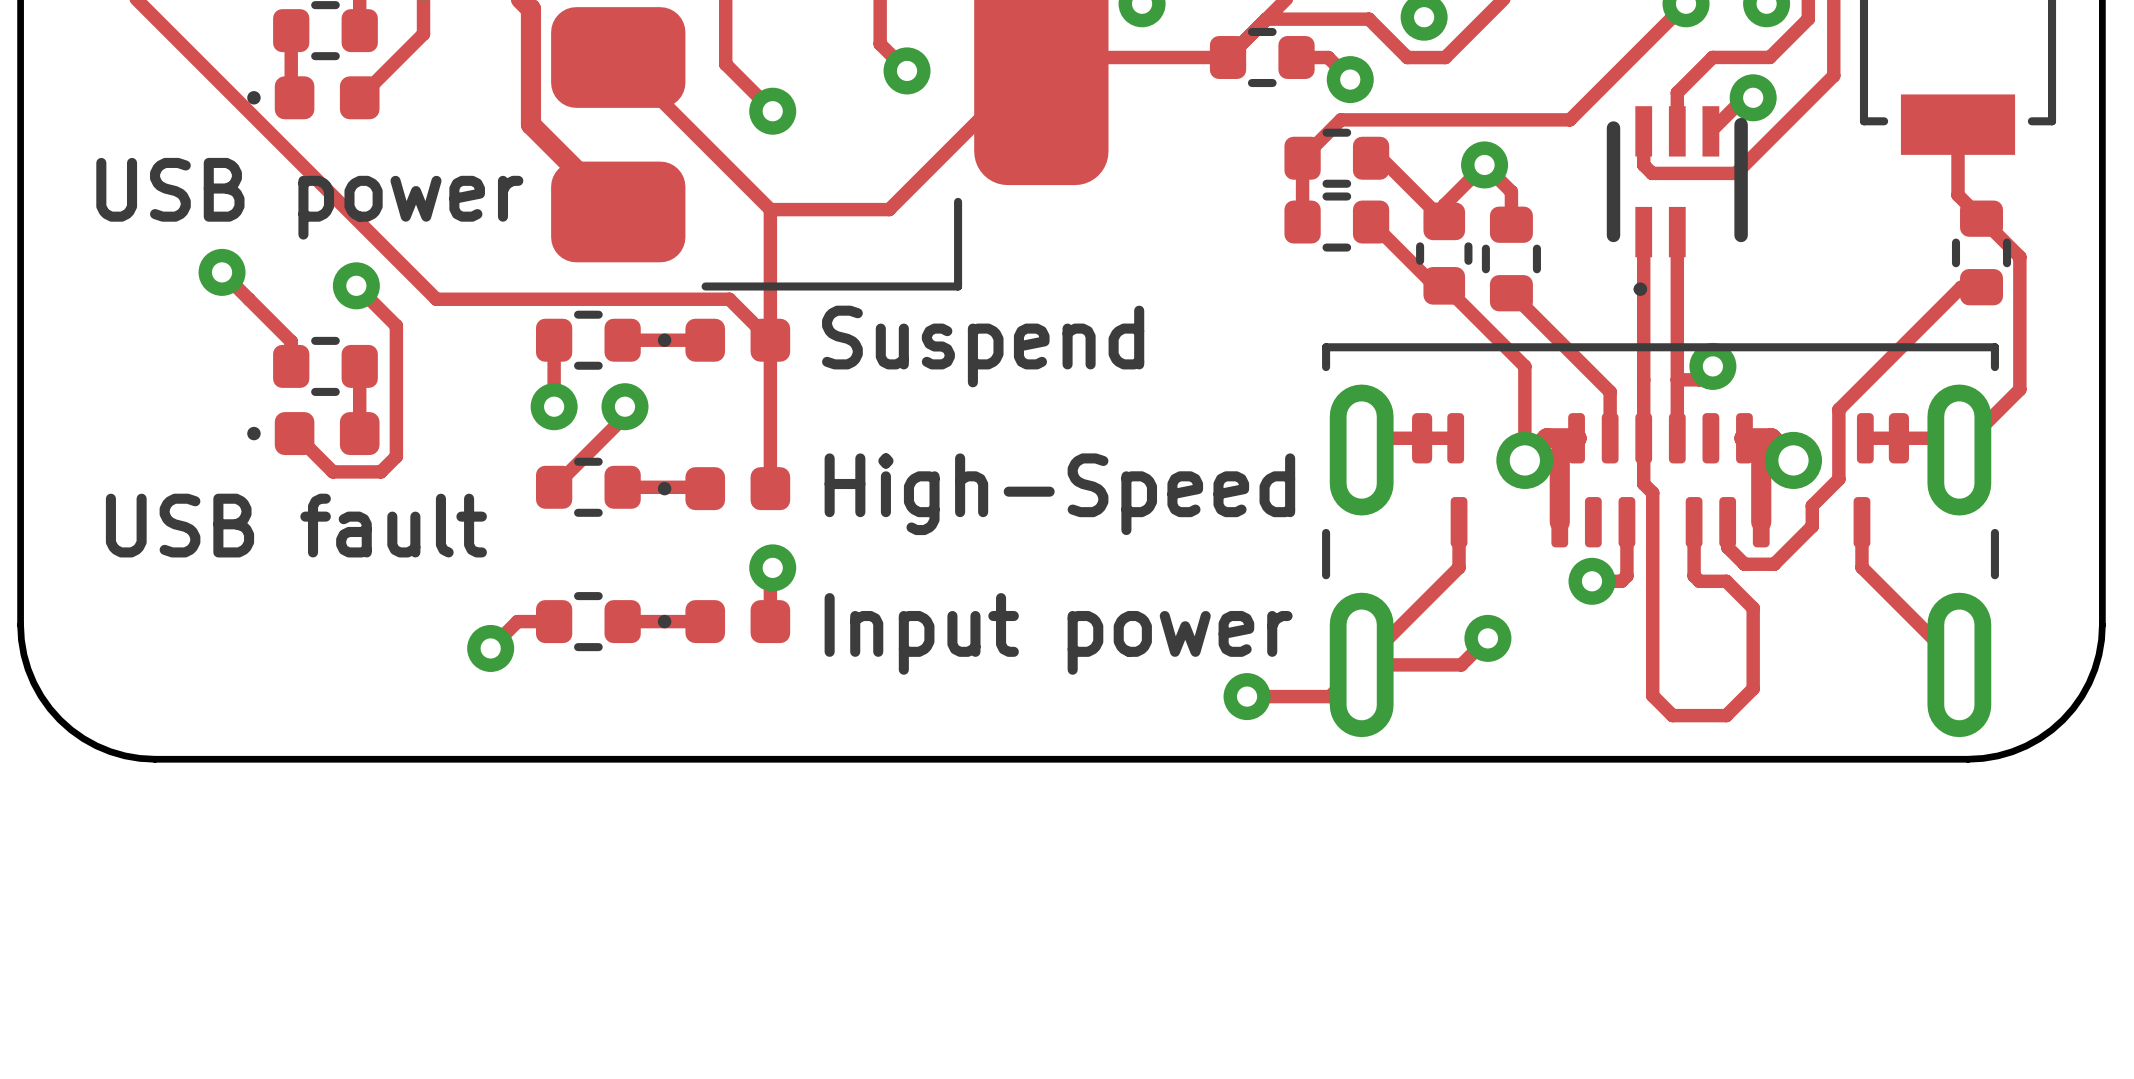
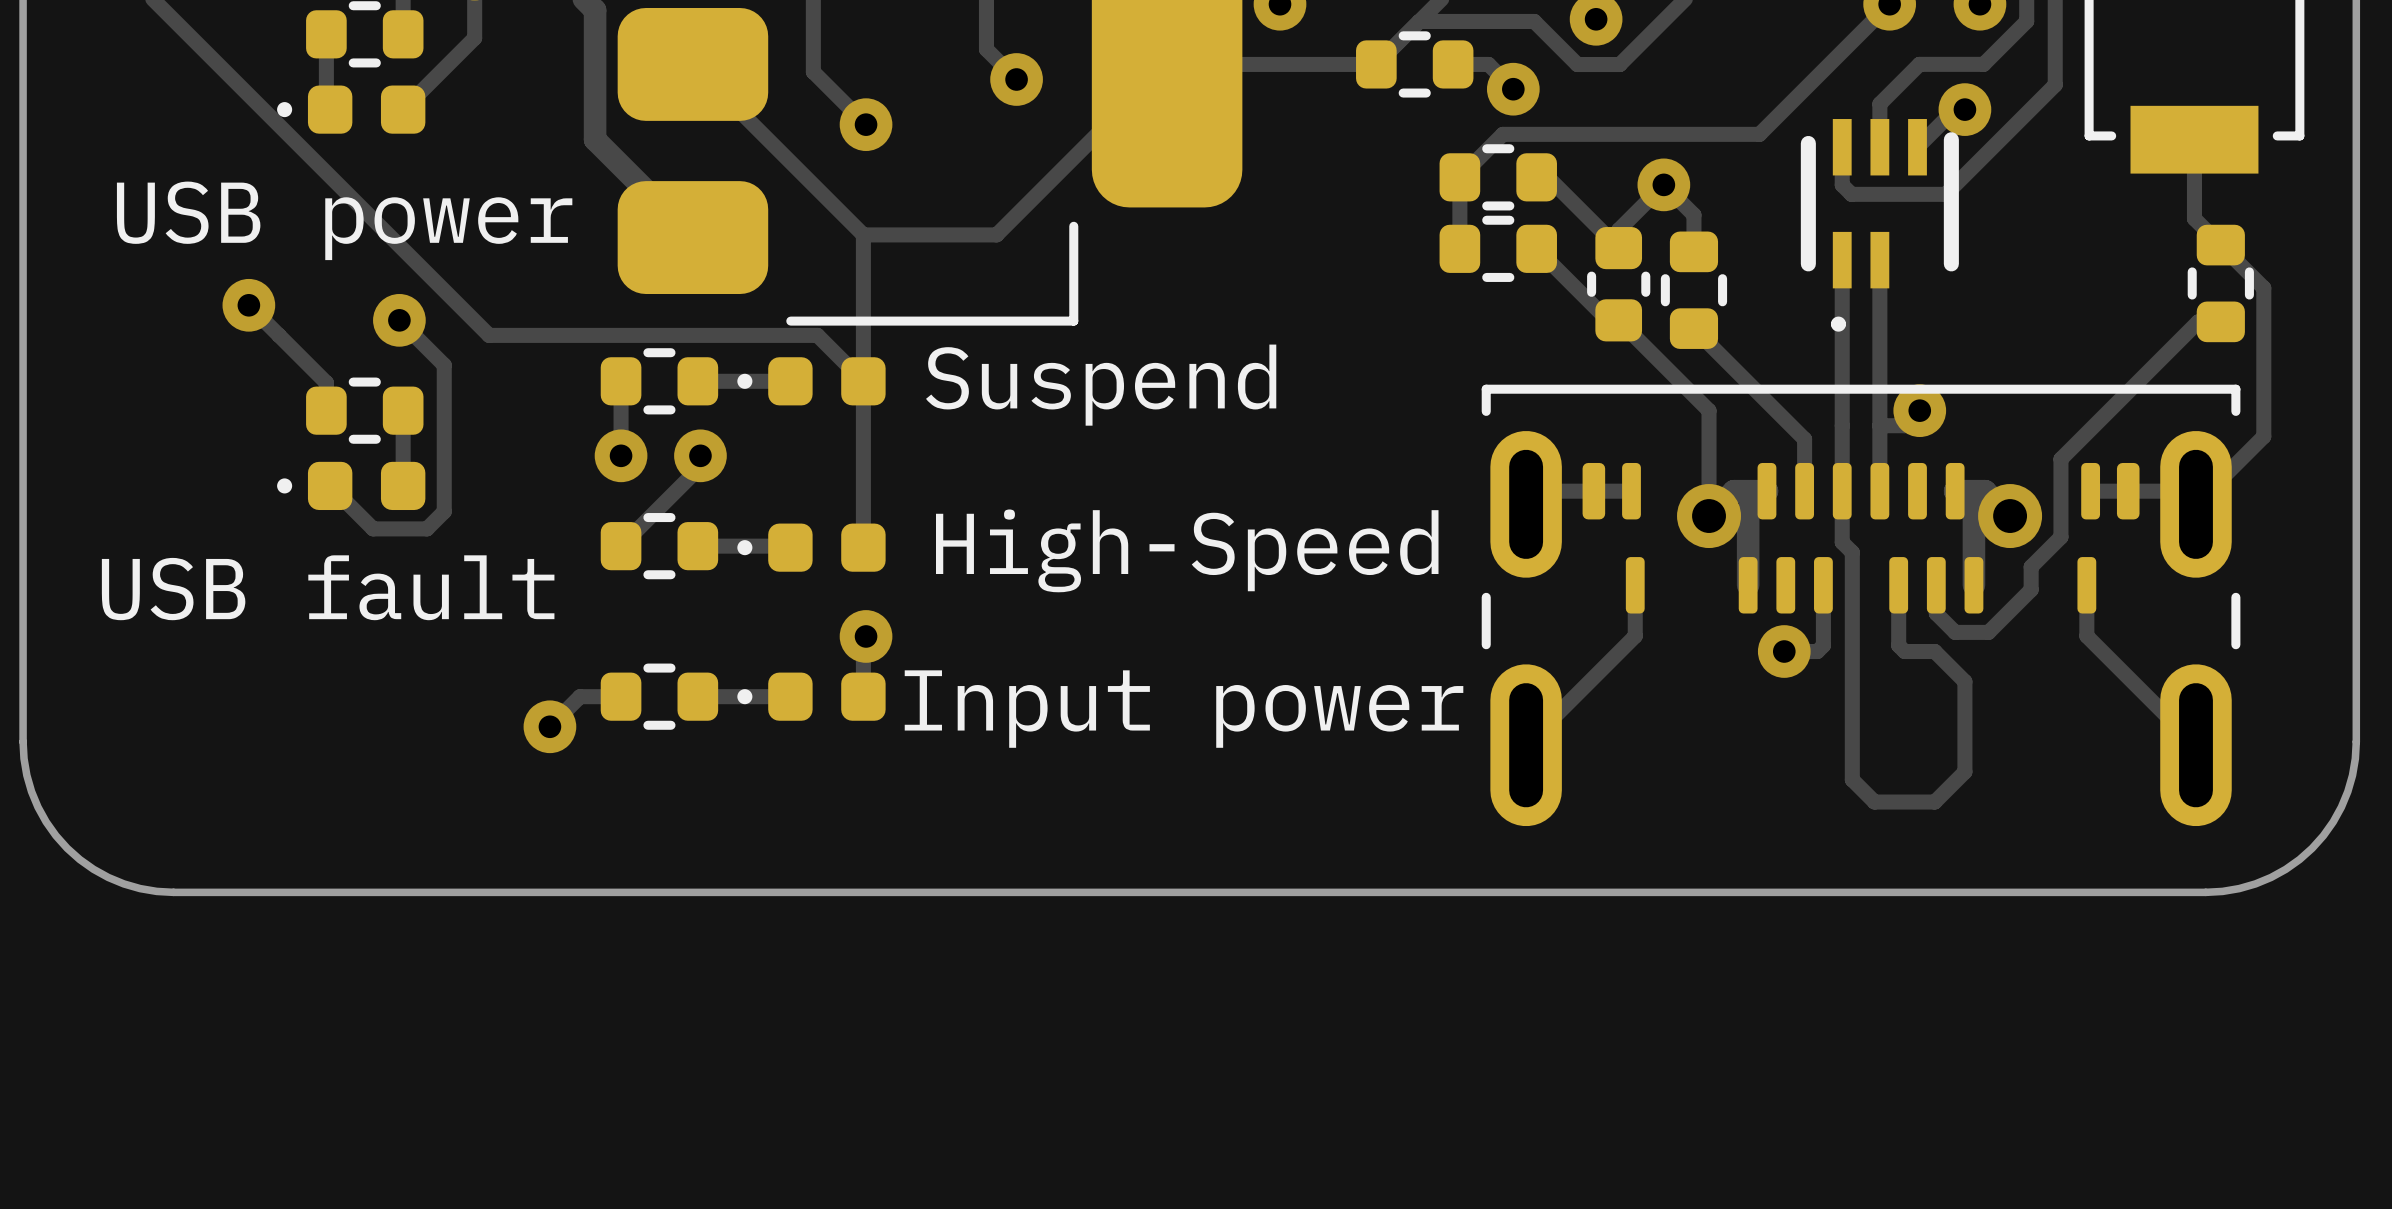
board edge: (20, 624) (23, 654) (33, 683) (49, 708) (59, 719) (83, 738) (110, 751) (139, 758) (154, 759) (1983, 758) (1997, 755) (2026, 745) (2039, 738) (2063, 719) (2081, 696) (2089, 683) (2099, 654) (2102, 624) -> (23, 700) (23, 741) (26, 775) (37, 807) (55, 835) (79, 859) (108, 877) (140, 888) (173, 892) (2222, 891) (2255, 883) (2285, 869) (2312, 848) (2333, 821) (2347, 791) (2352, 775) (2356, 741) (2356, 700)
track: (1487, 638) (1461, 664) (1361, 664) (1330, 696) (1247, 696) -> none
via: (1487, 638) -> none
via: (1247, 696) -> none

